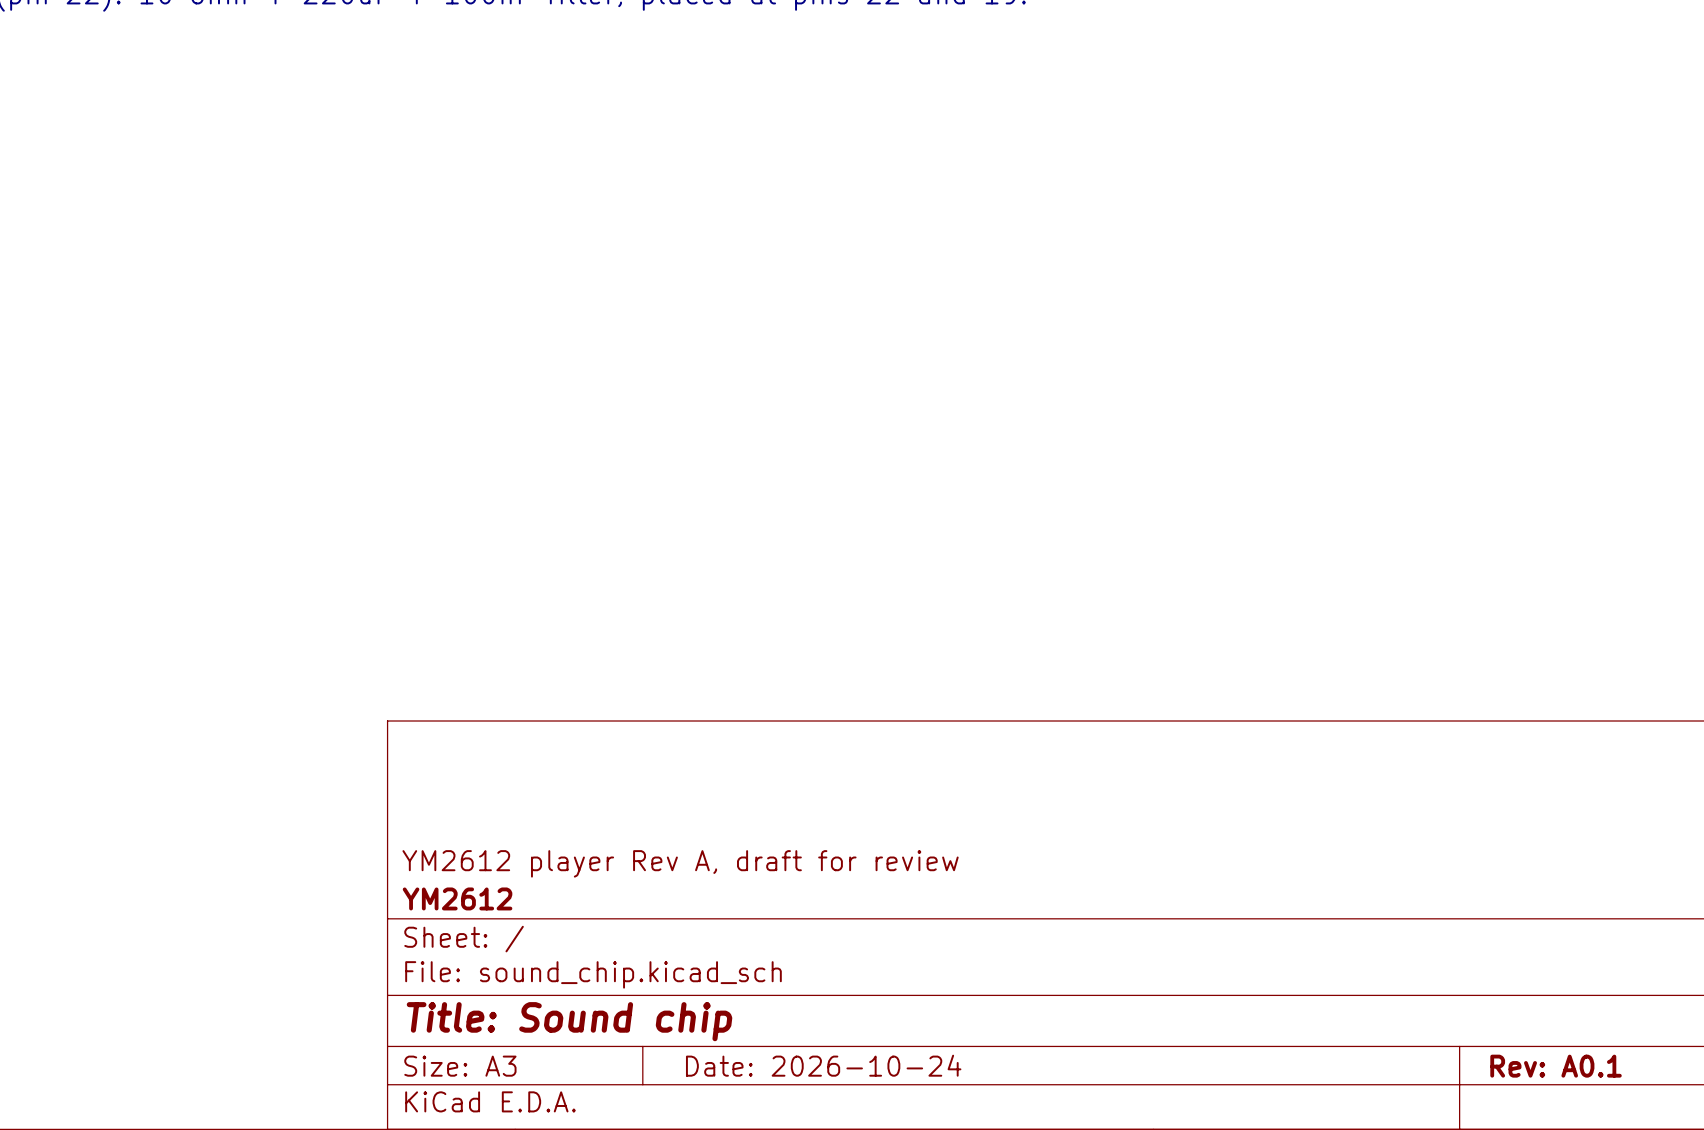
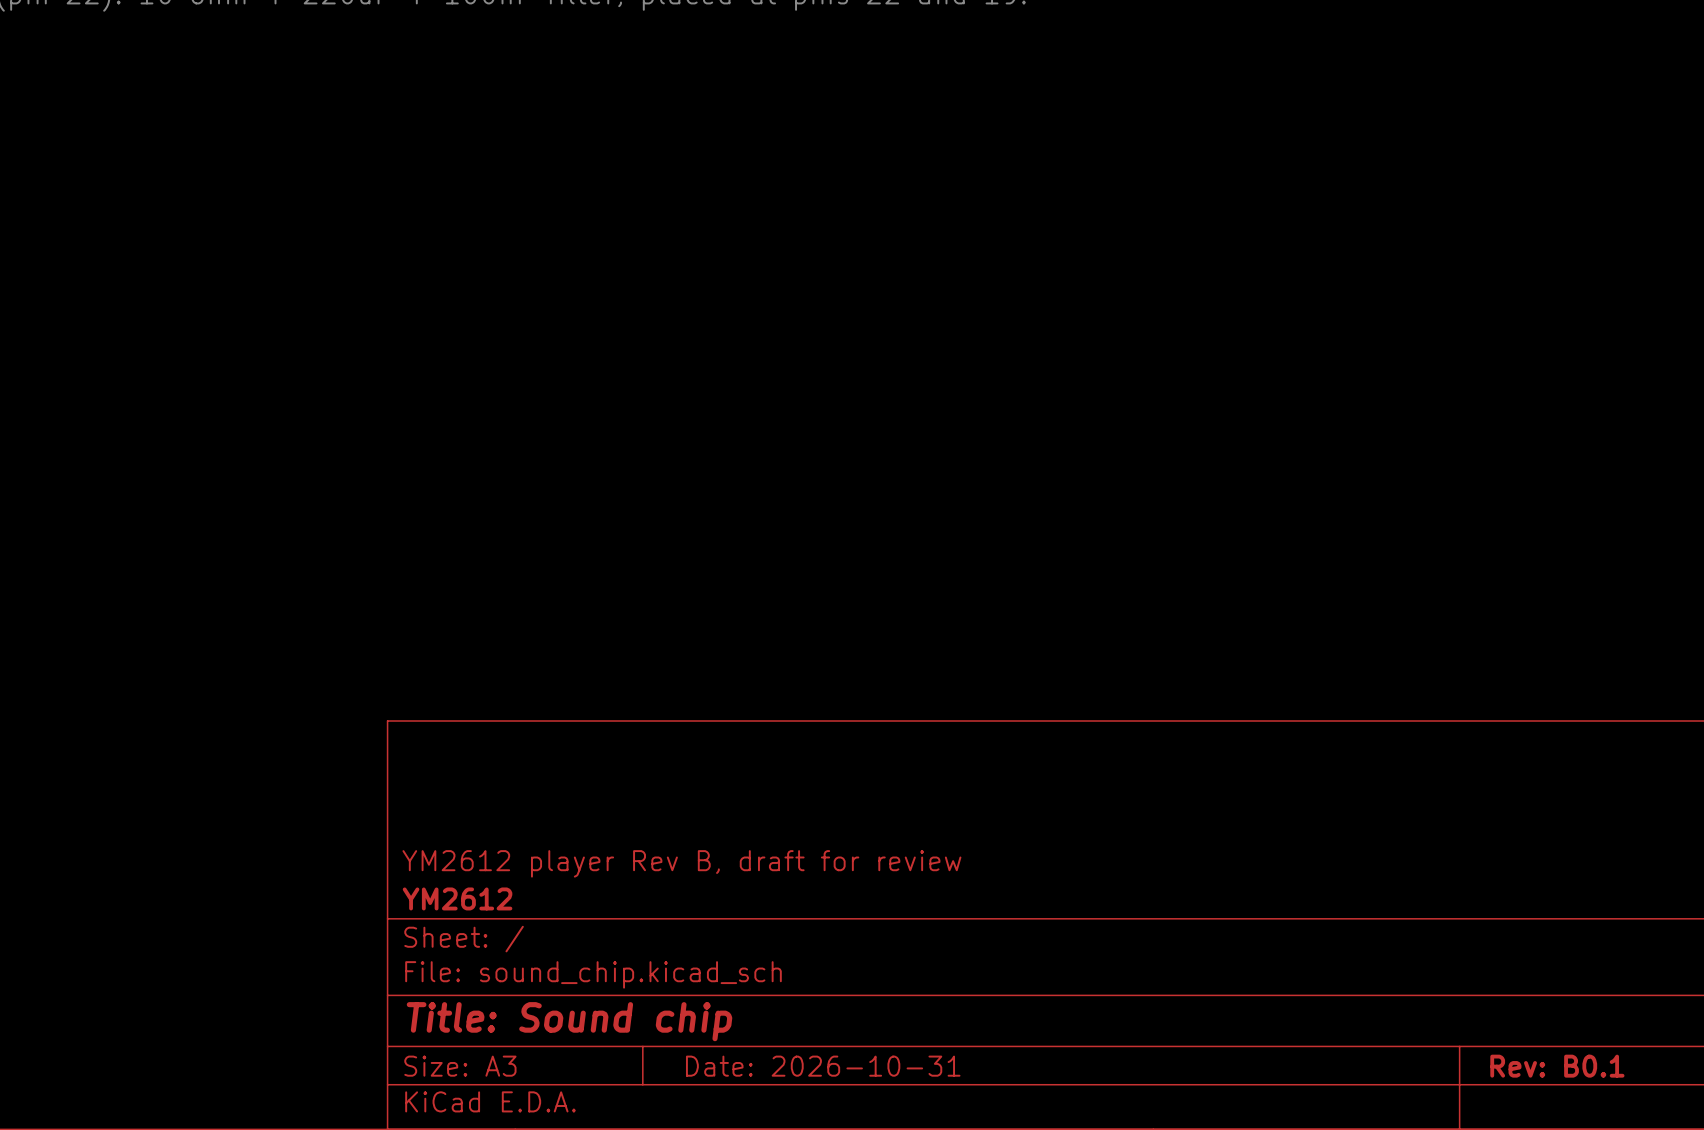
title block: YM2612 player Rev A, draft for review (680, 863) -> YM2612 player Rev B, draft for review (681, 863)
title block: Date: 2026-10-24 (823, 1065) -> Date: 2026-10-31 (823, 1066)
title block: Rev: A0.1 (1556, 1066) -> Rev: B0.1 (1557, 1066)

